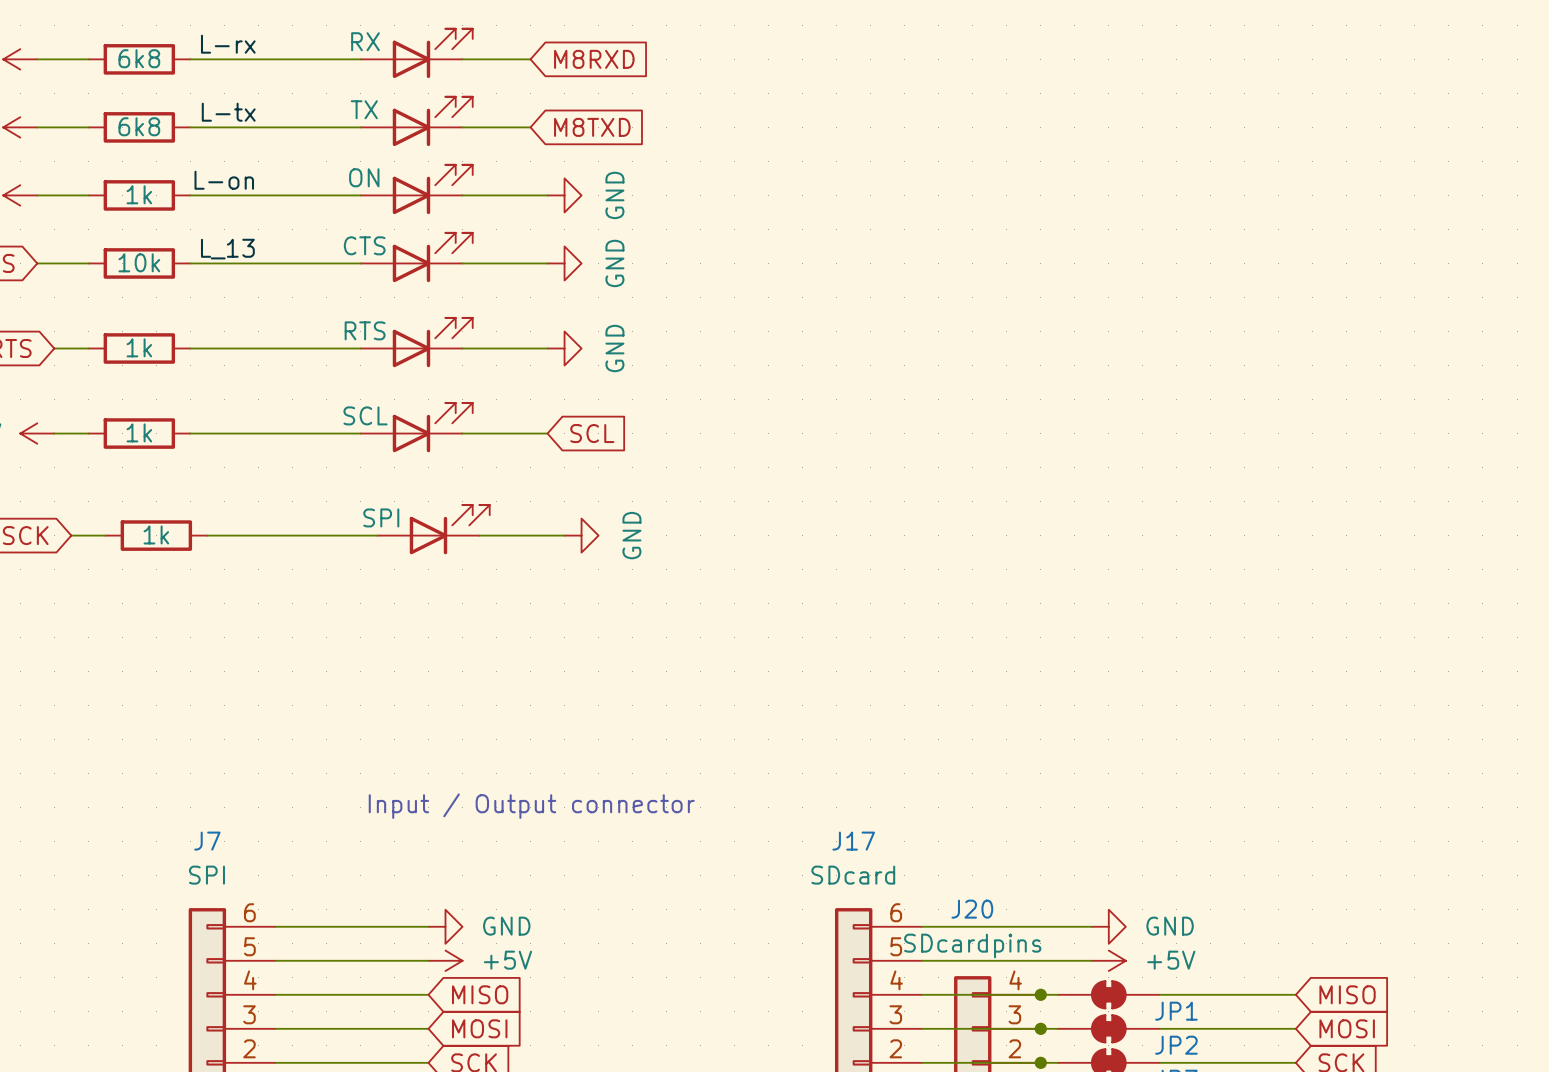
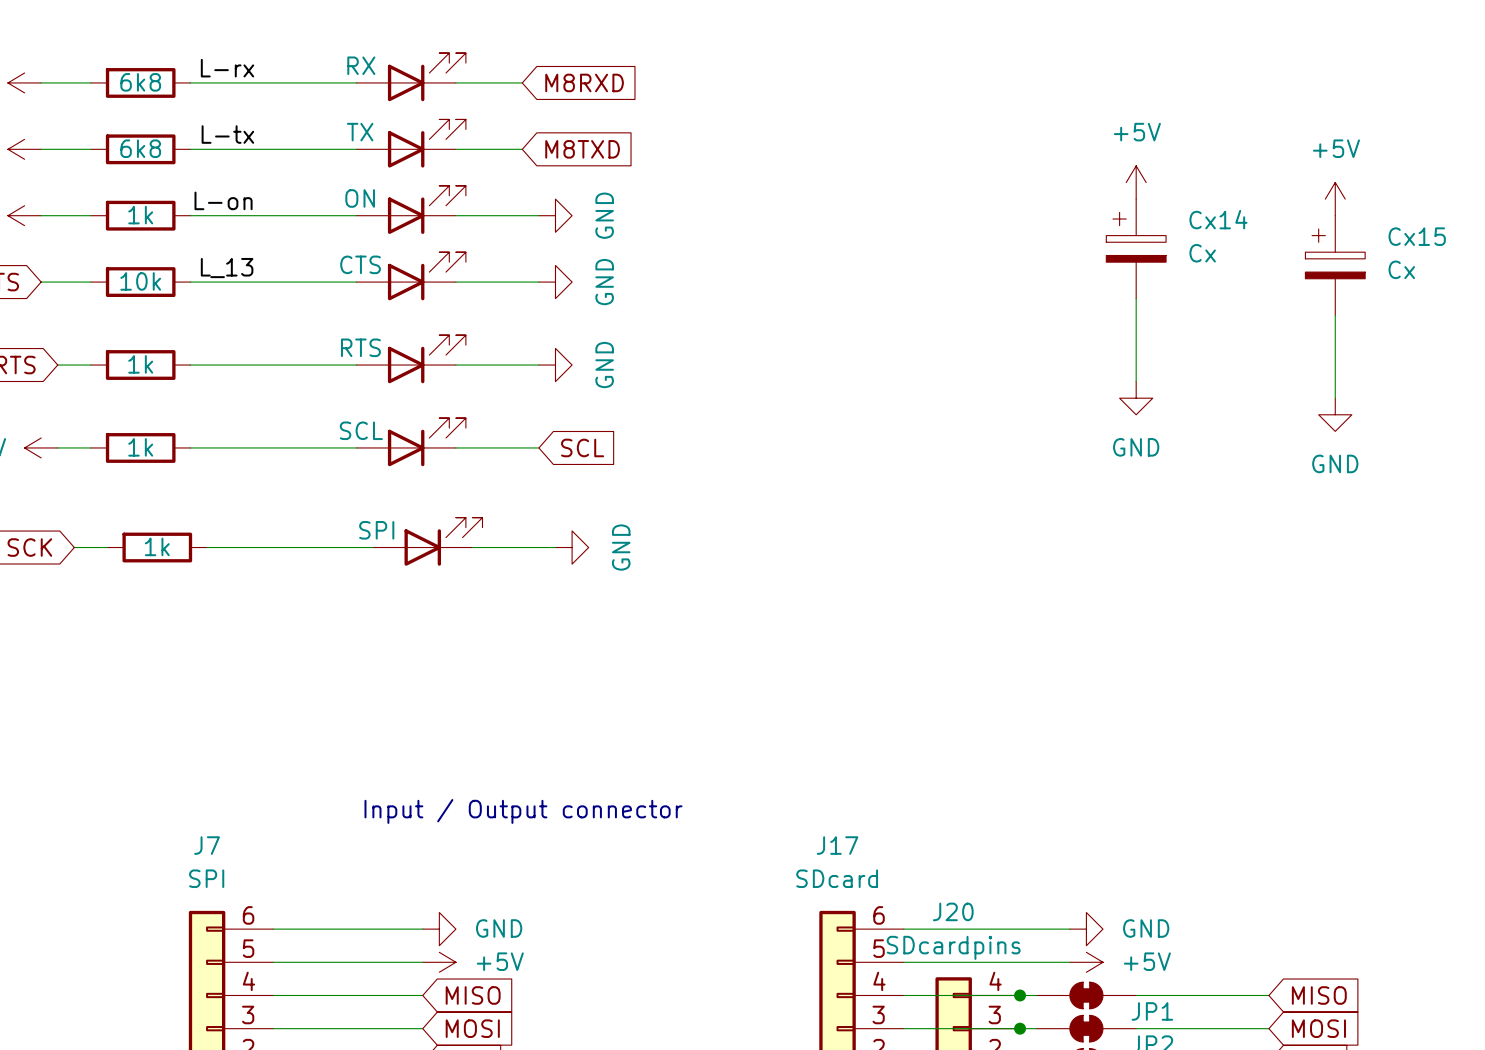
power symbol: none -> +5V (1136, 182)
power symbol: none -> +5V (1335, 199)
Cx14: none -> Cx (1136, 248)
Cx15: none -> Cx (1335, 265)
wire: none -> (1136, 298) (1136, 381)
wire: none -> (1335, 315) (1335, 398)
power symbol: none -> GND (1136, 398)
power symbol: none -> GND (1335, 414)

